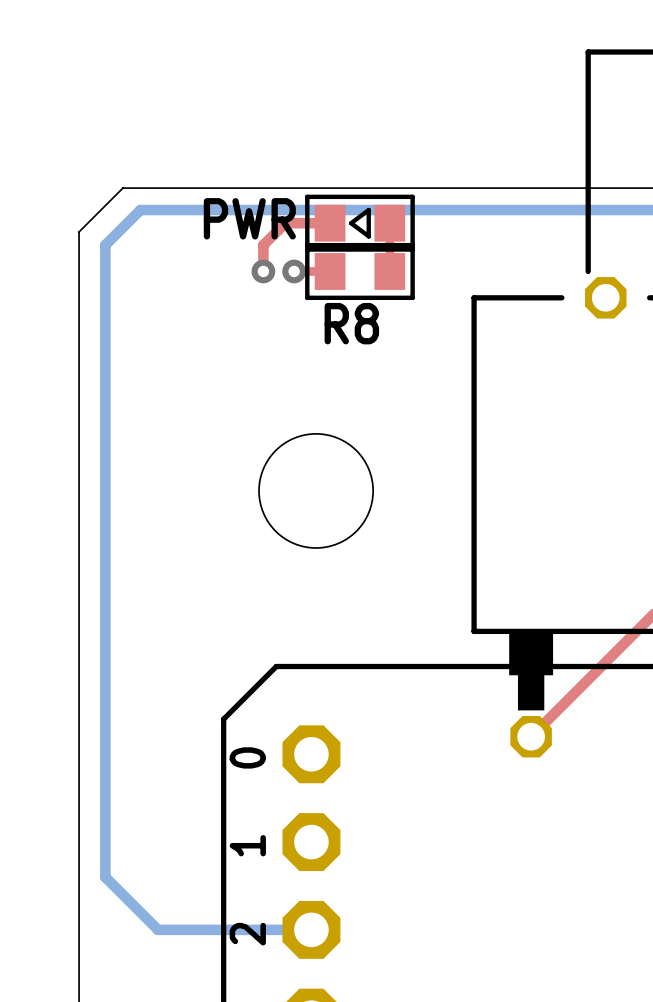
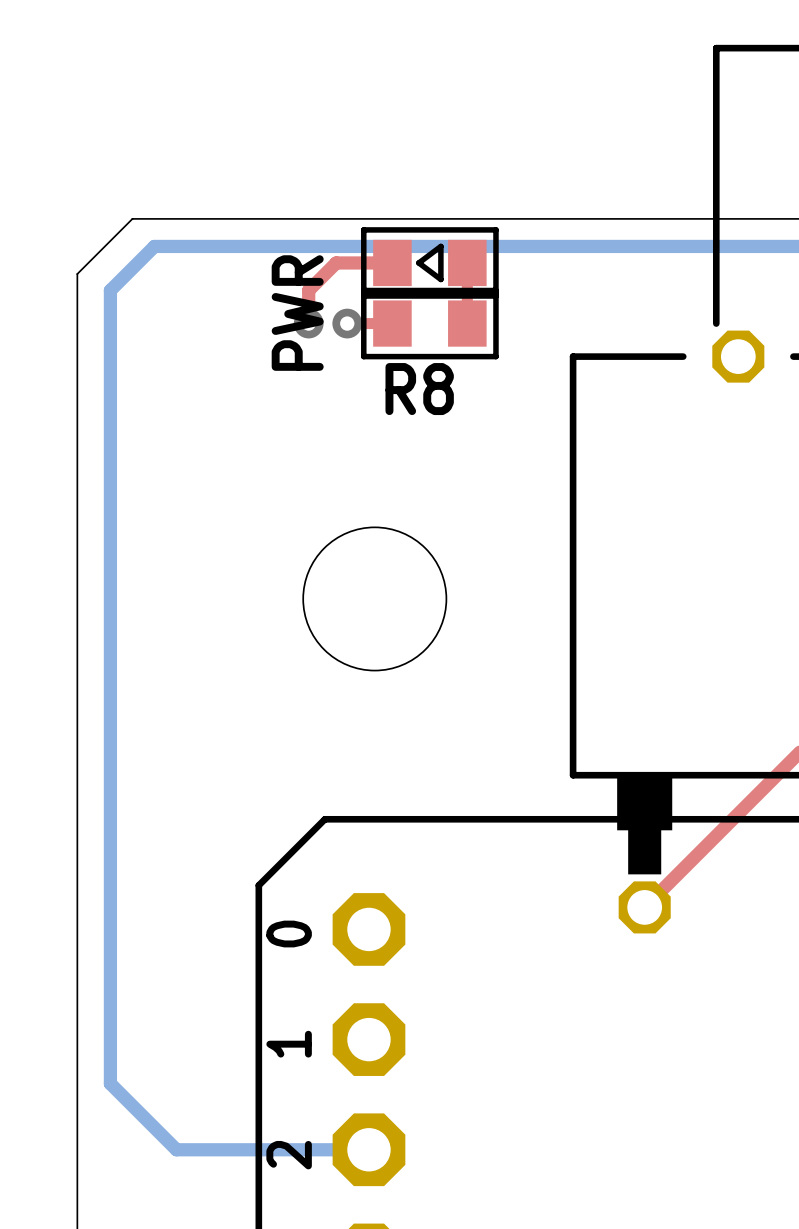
PWR name rotation: 0° (249, 218) -> 90° counterclockwise (297, 313)

